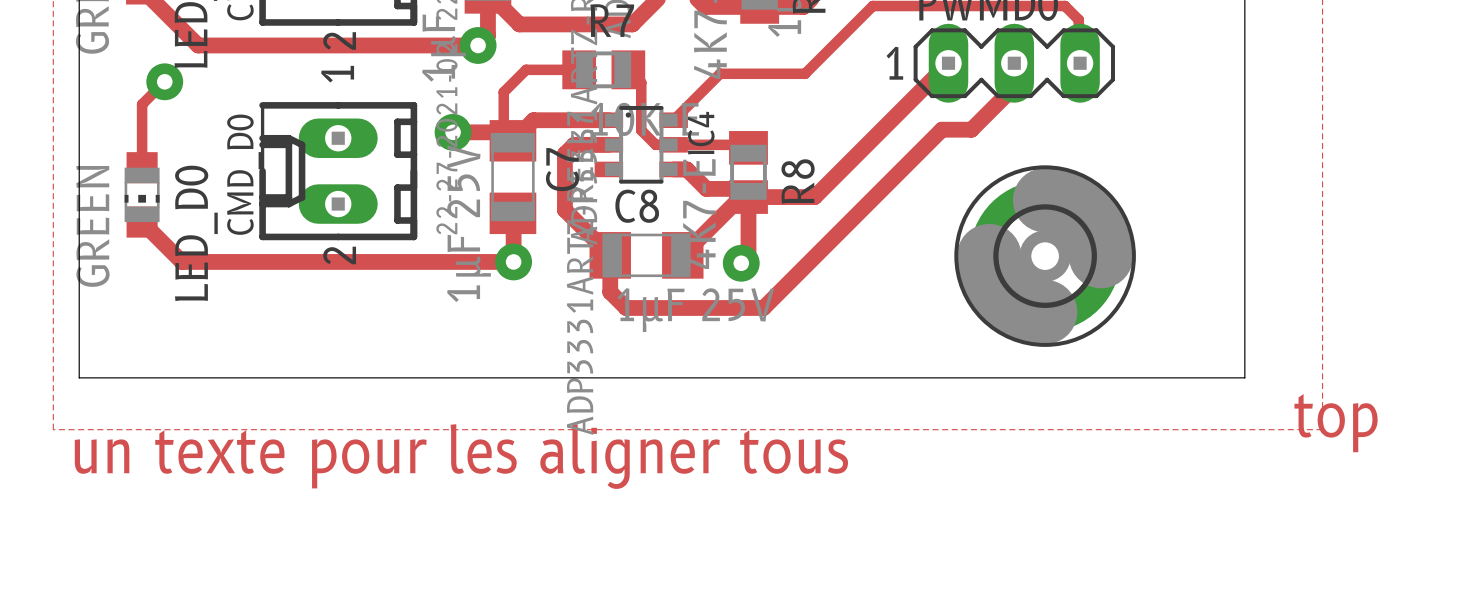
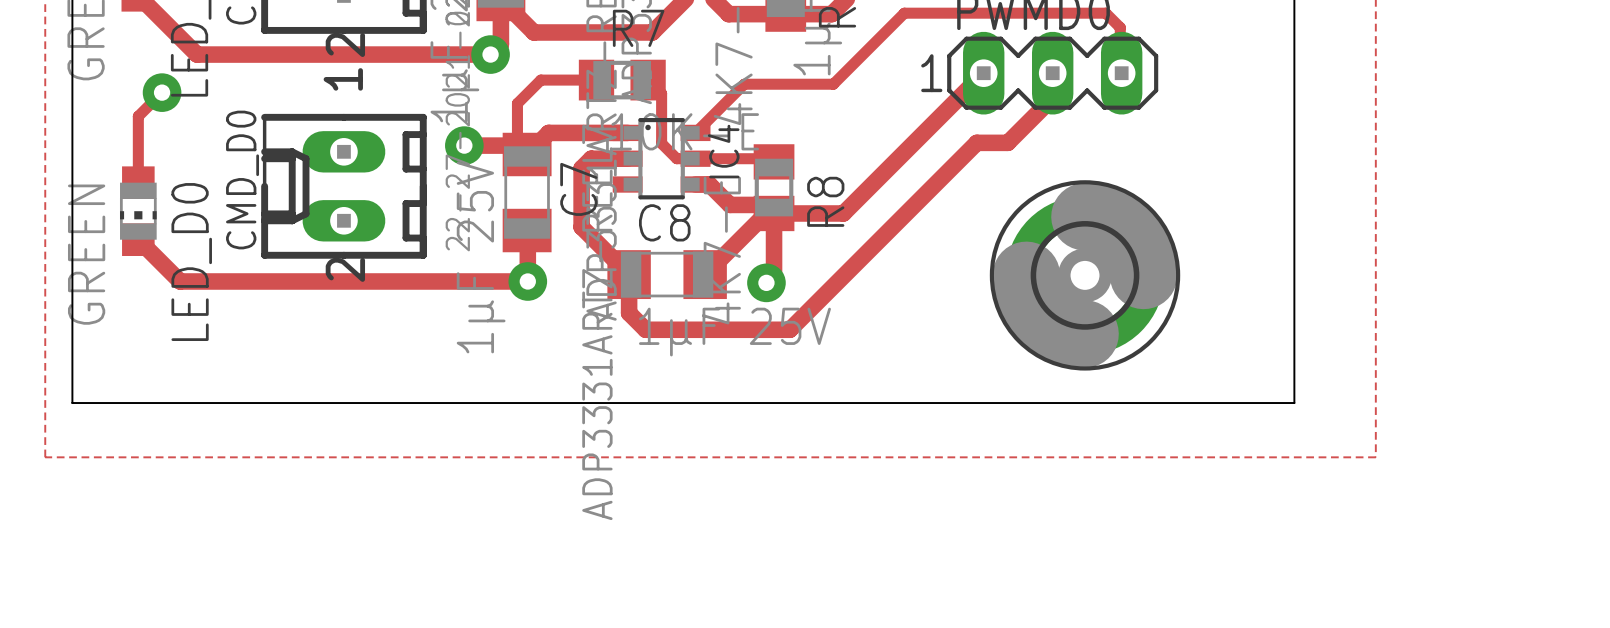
text: top (1336, 423) -> none
text: un texte pour les aligner tous (461, 456) -> none

